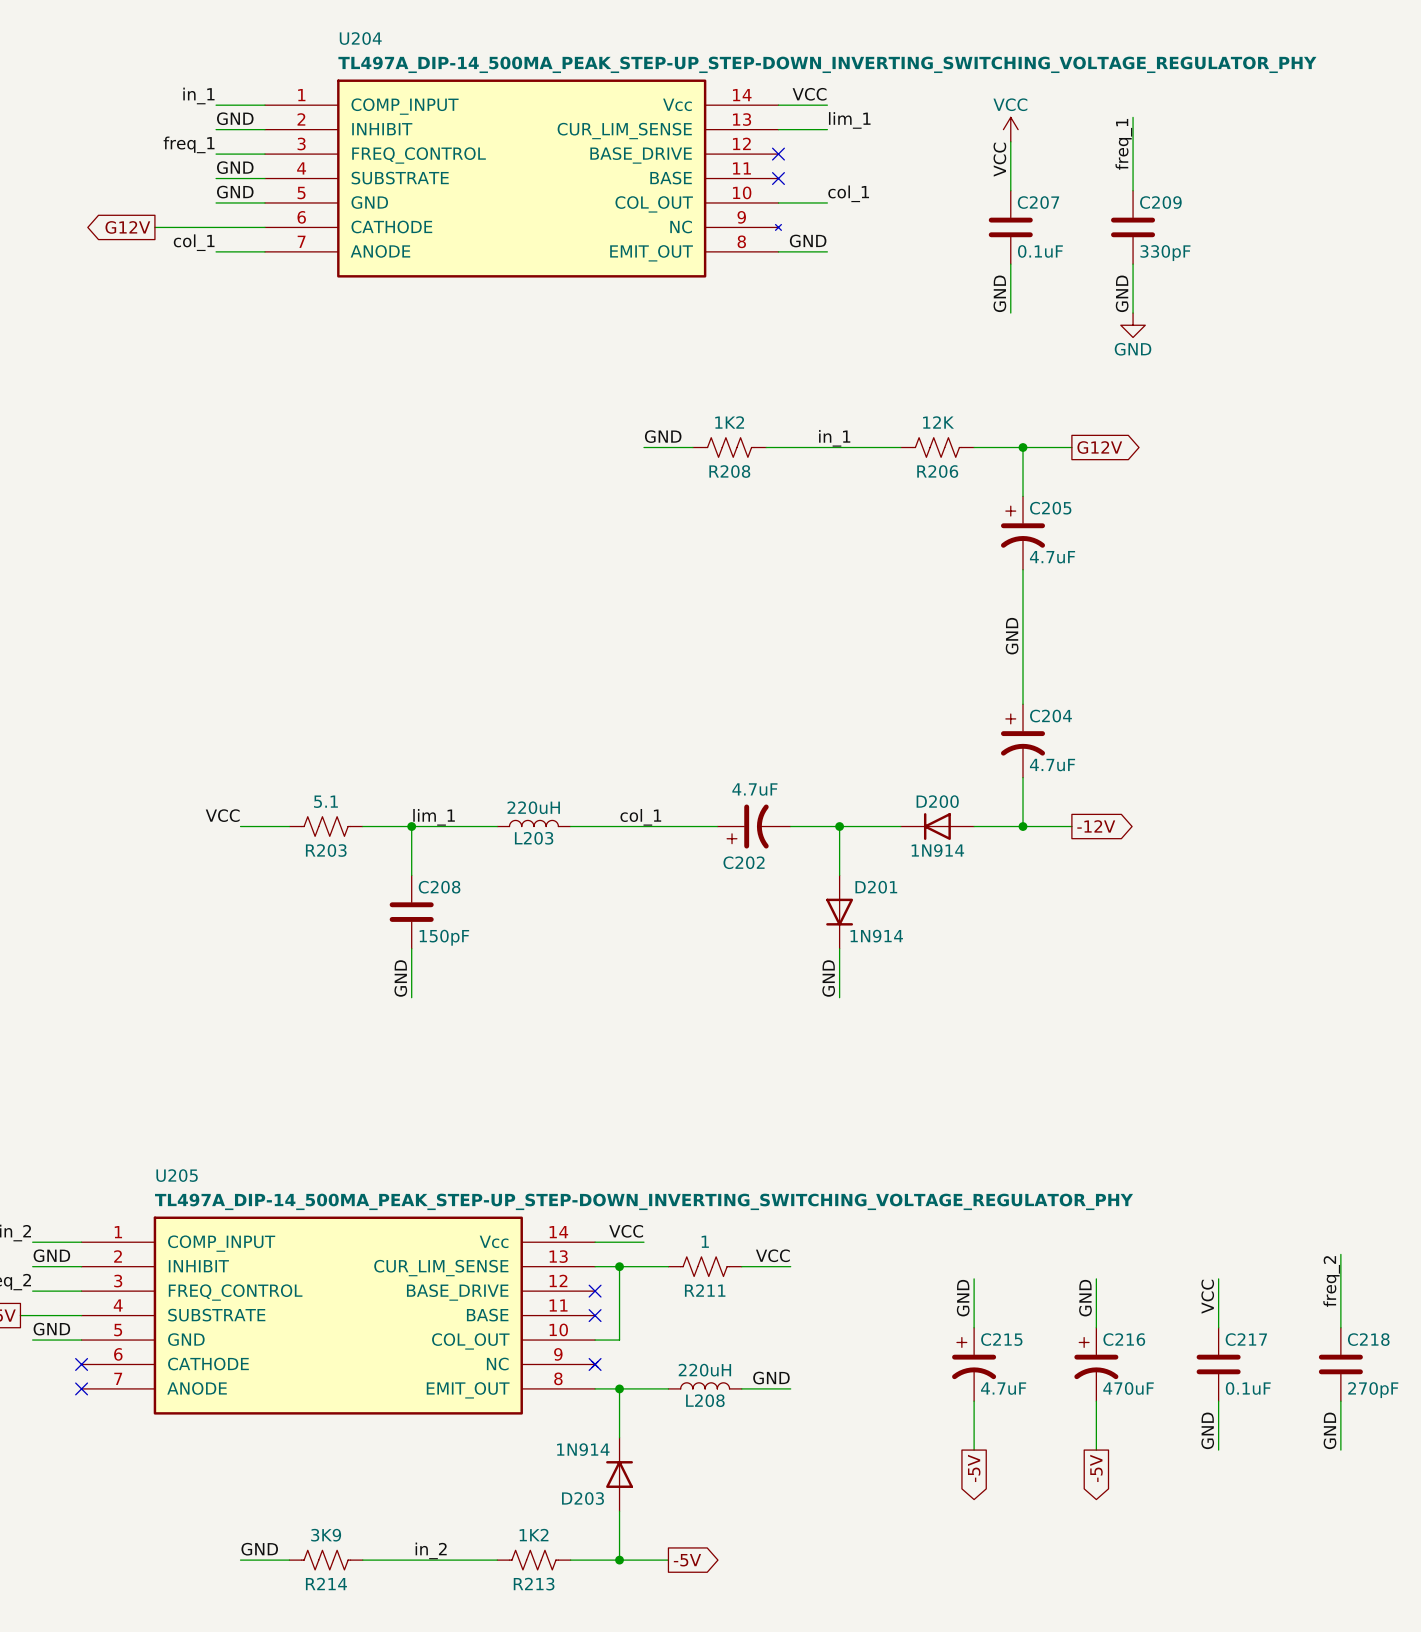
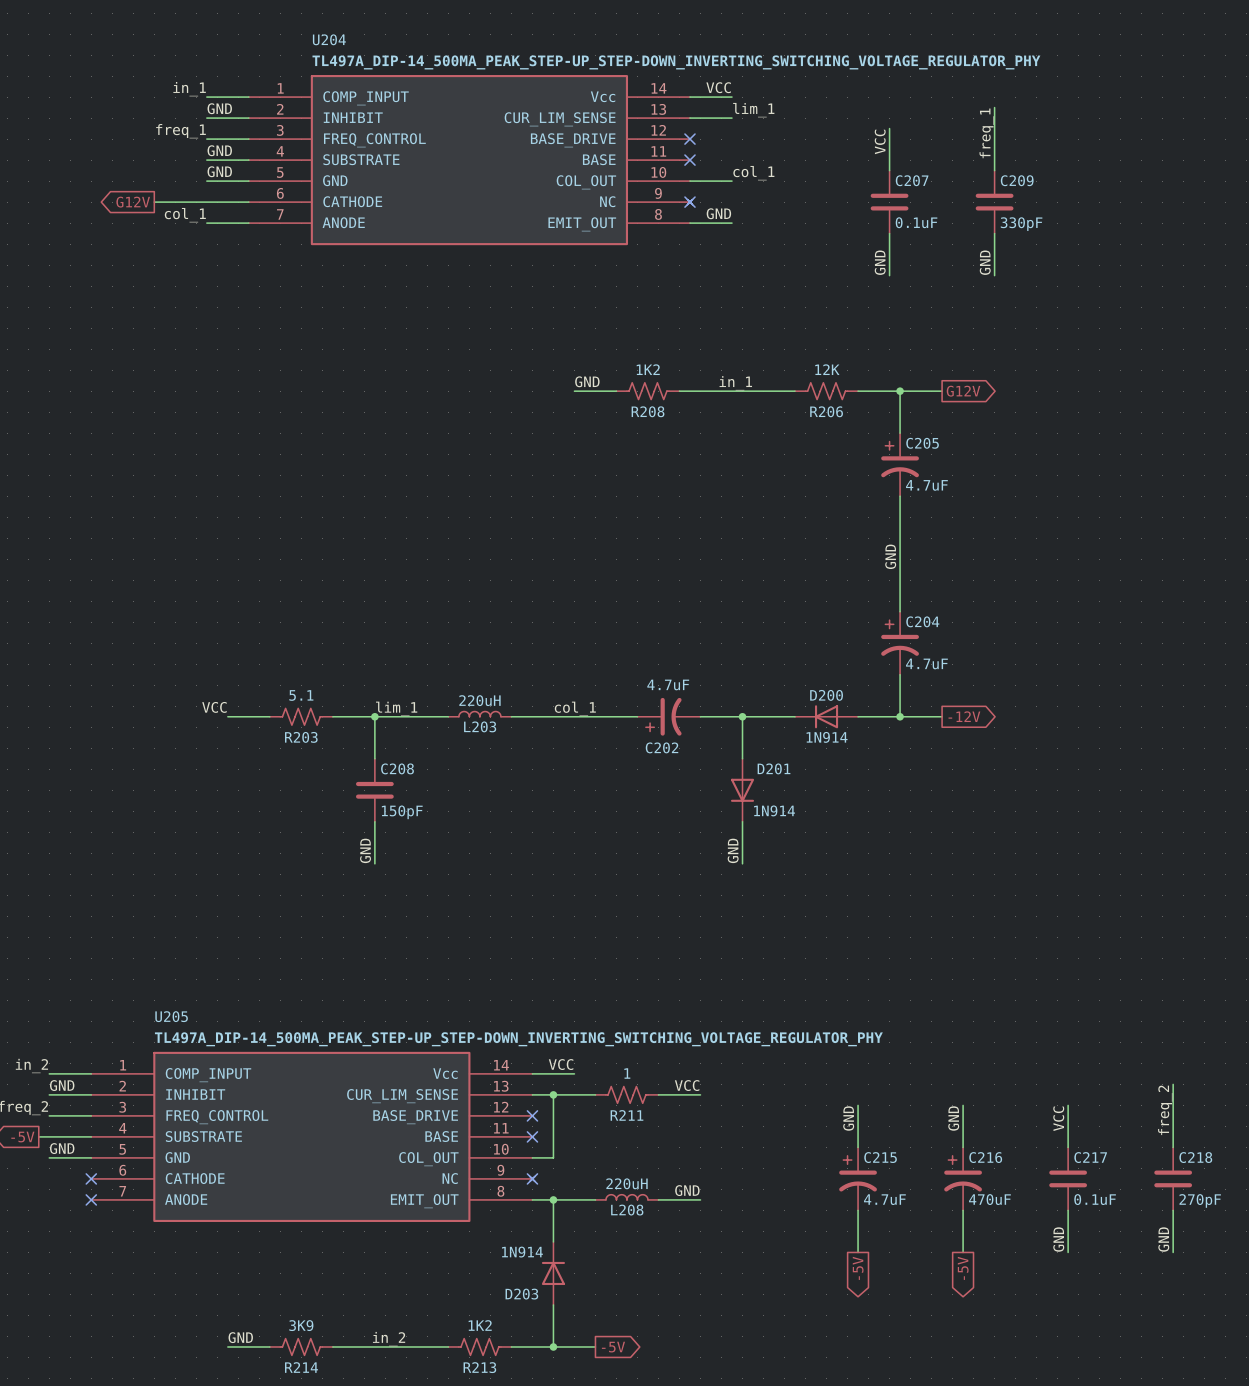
power symbol: VCC (1010, 129) -> none
no-connect mark: none -> (689, 202)
power symbol: GND (1133, 325) -> none

